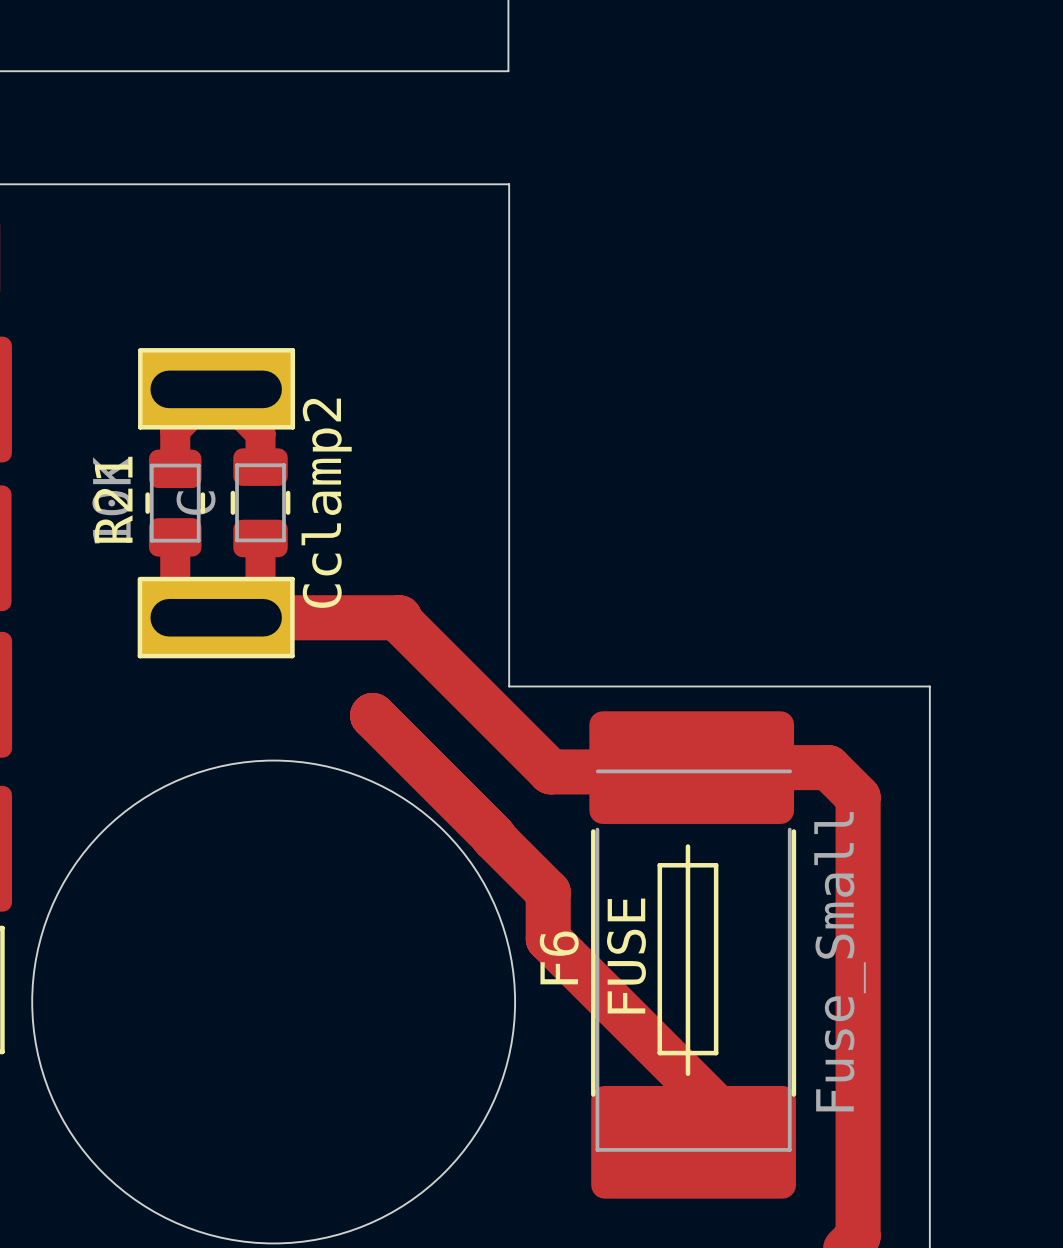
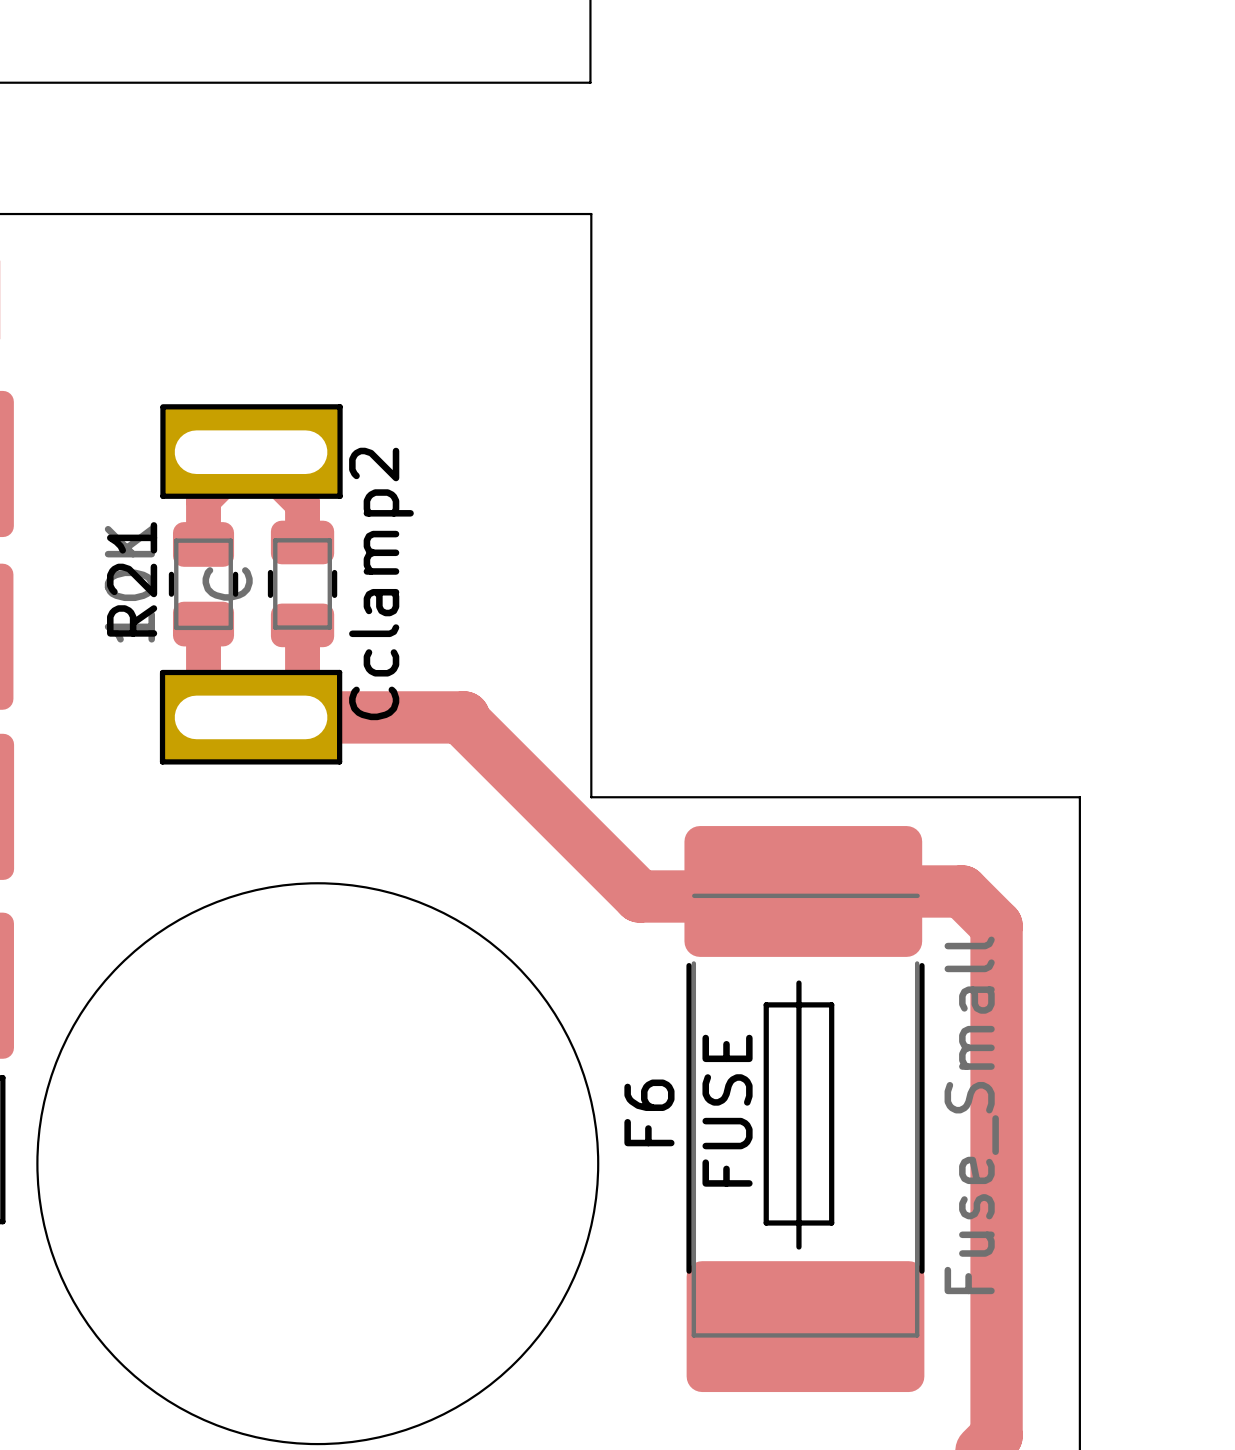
top track: (372, 715) (548, 892) (548, 938) (755, 1146) -> none

